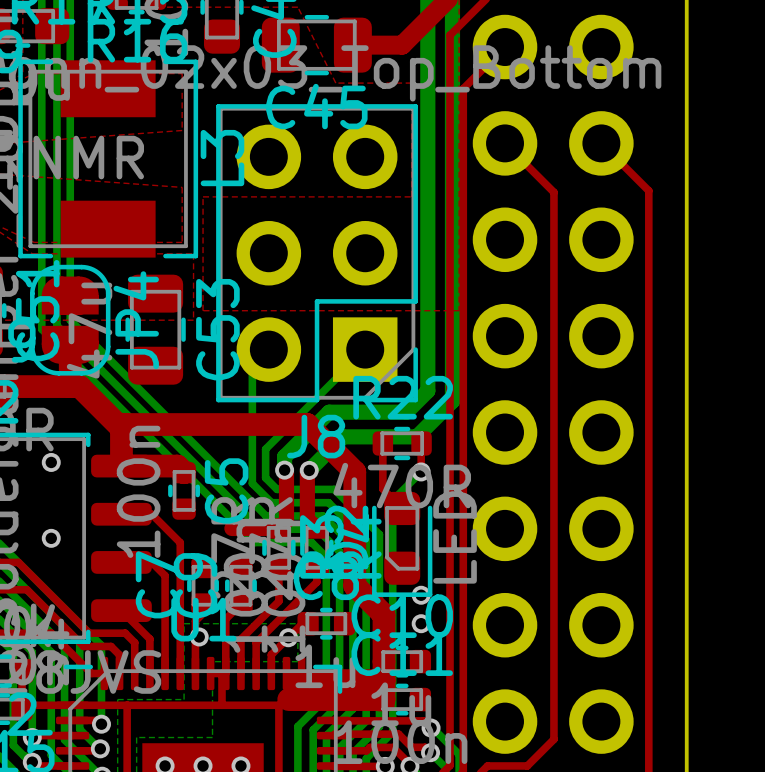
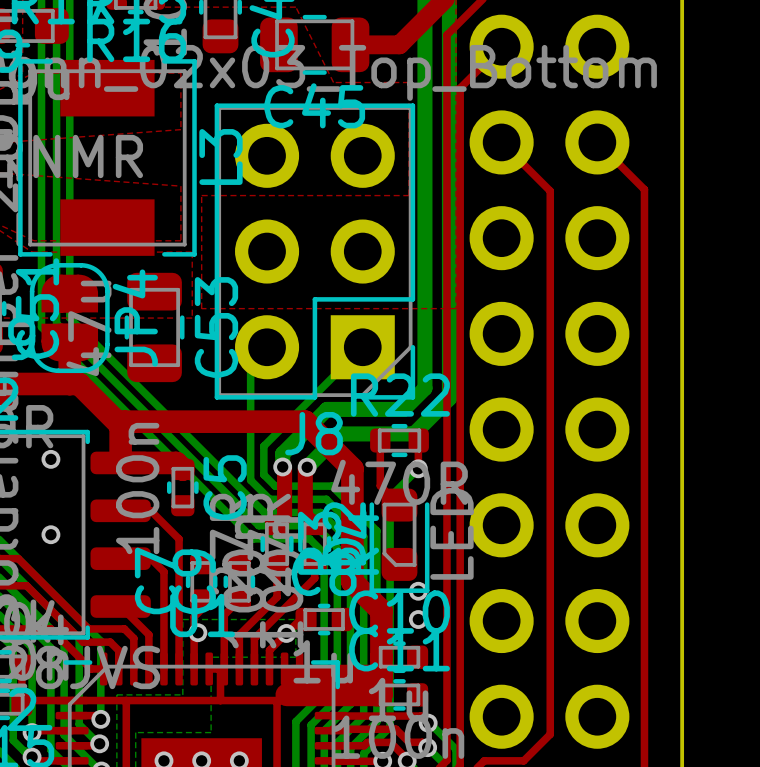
top track: (231, 528) (278, 528) -> none

